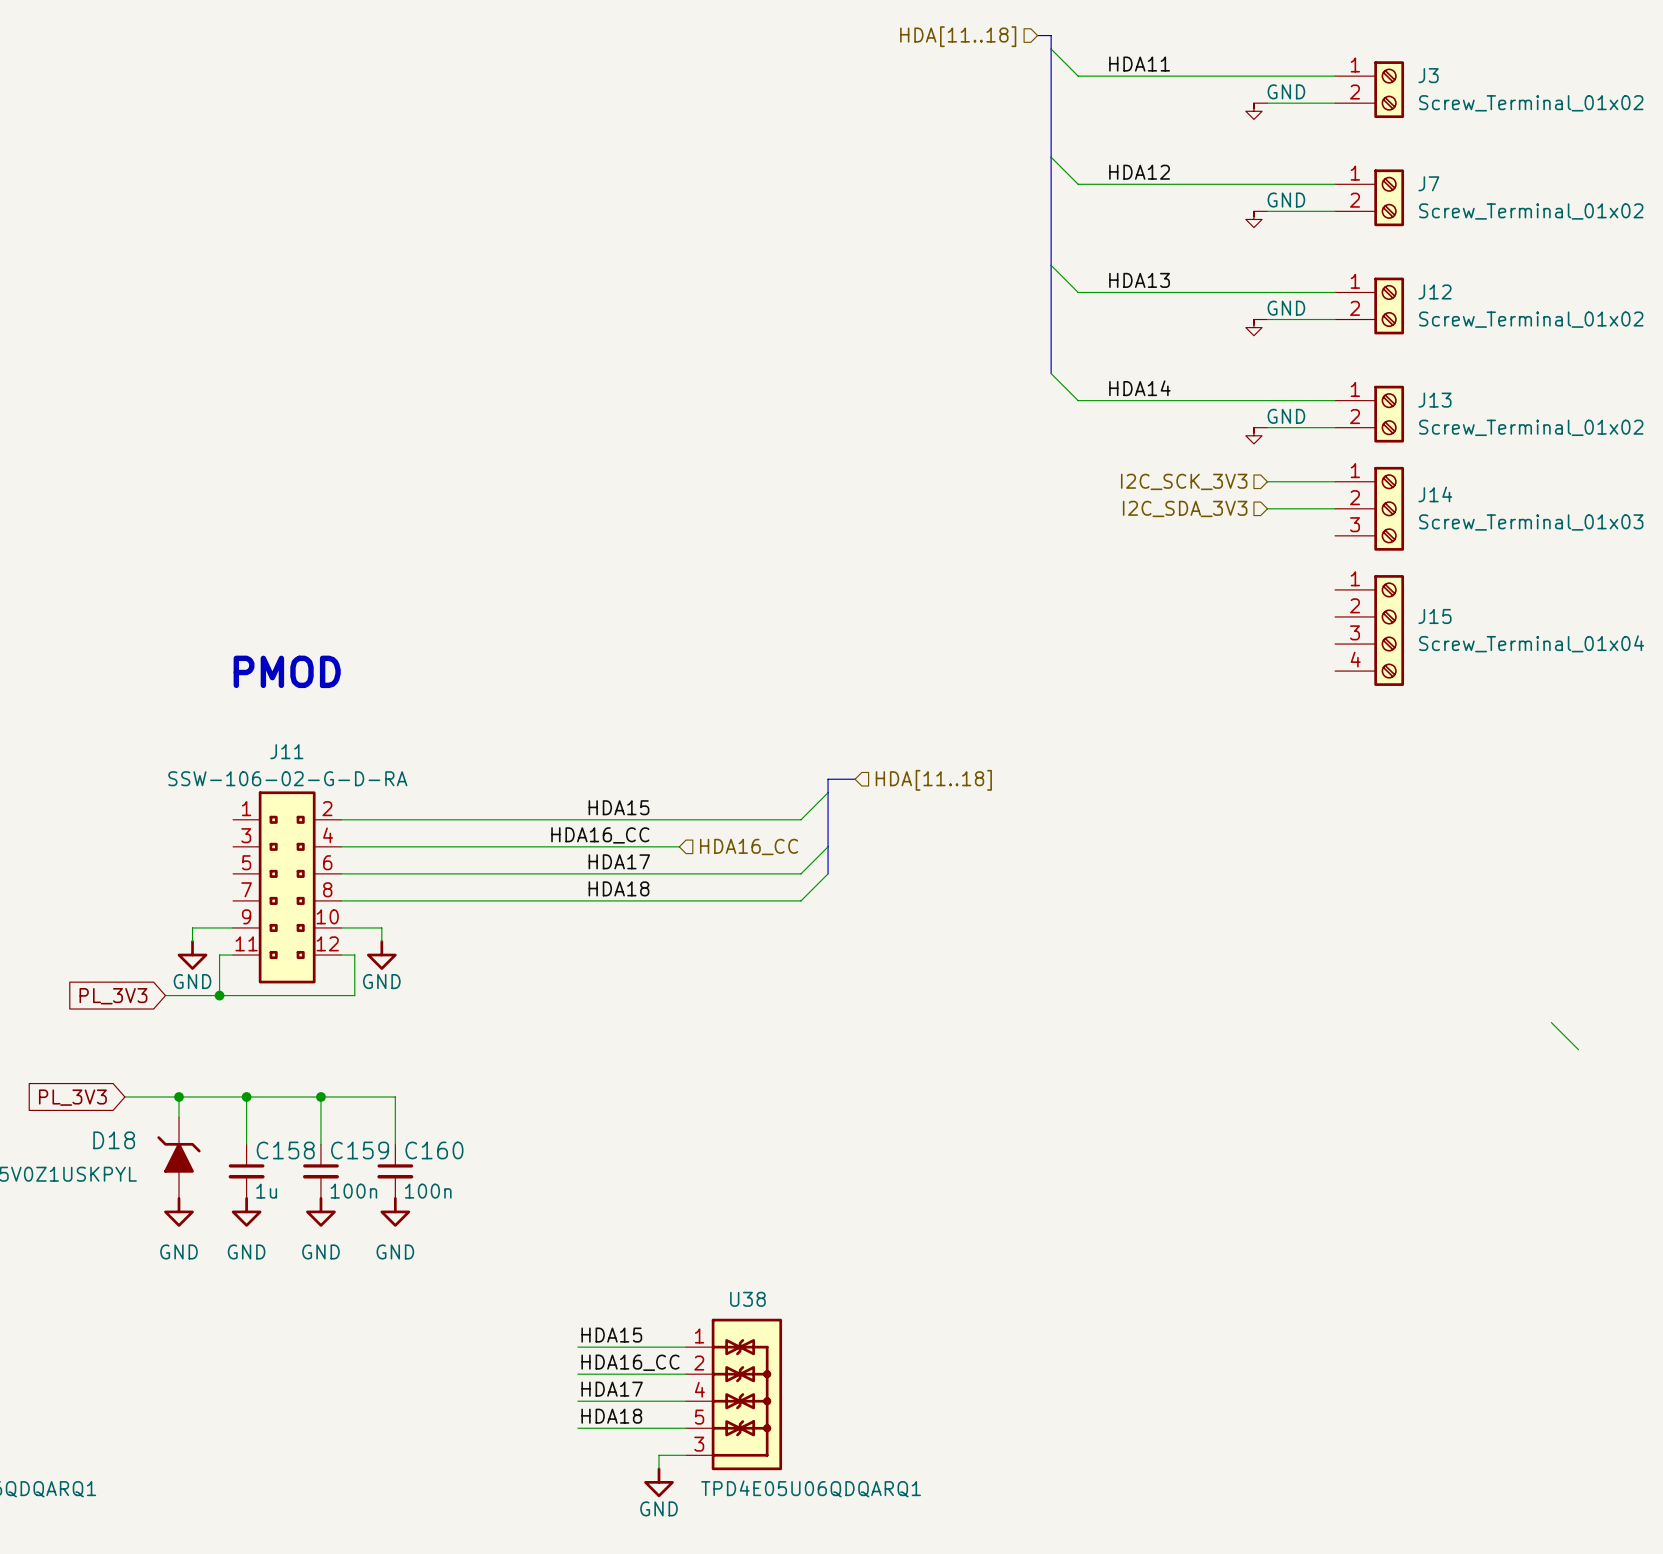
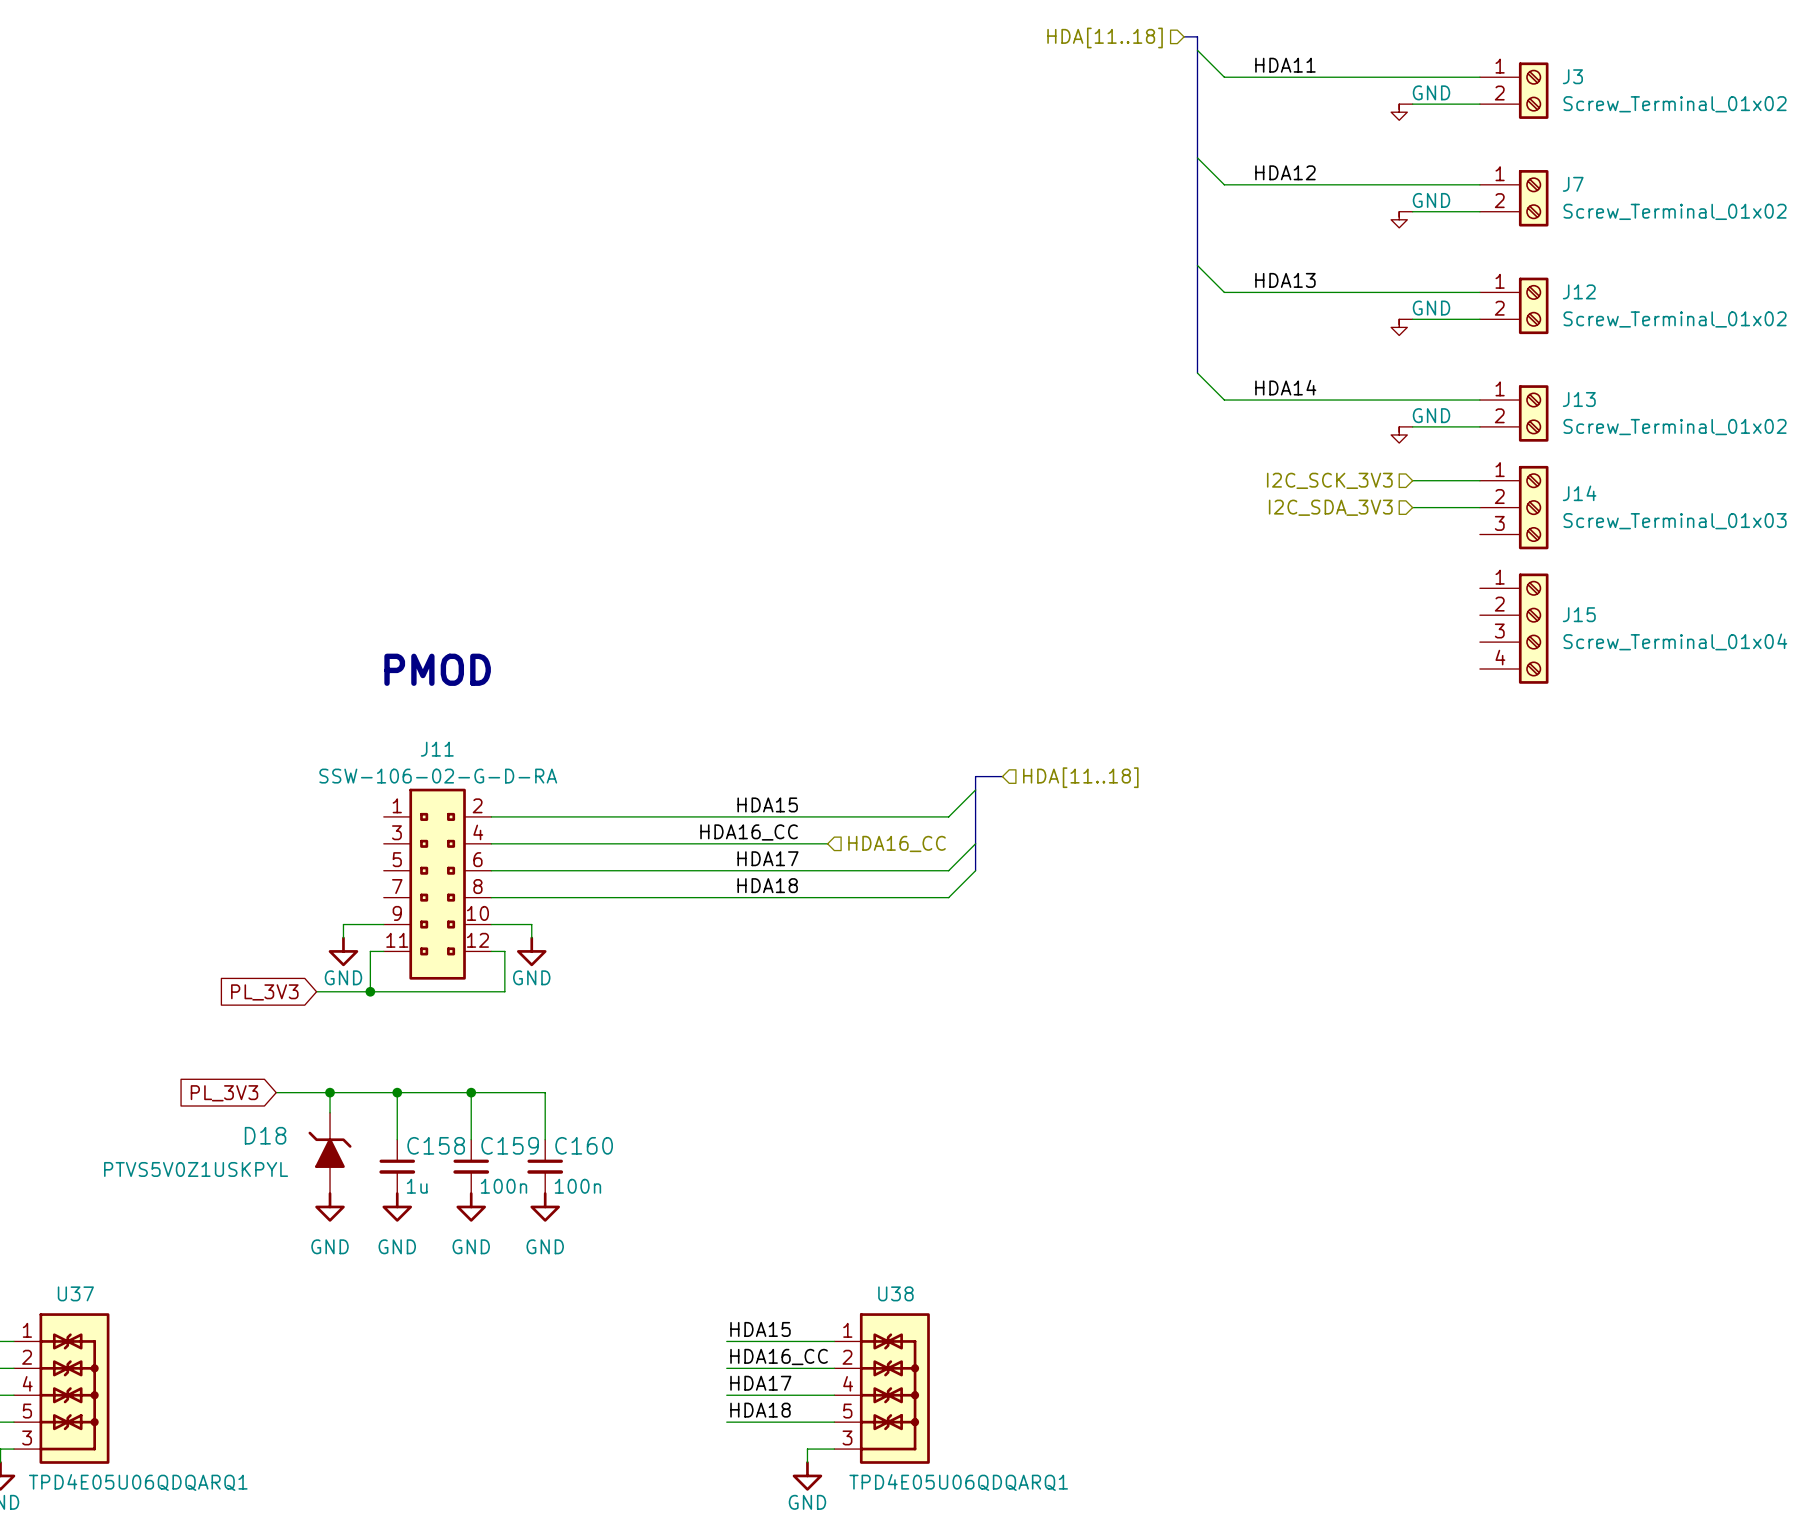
wire: (1551, 1022) (1578, 1049) -> none

